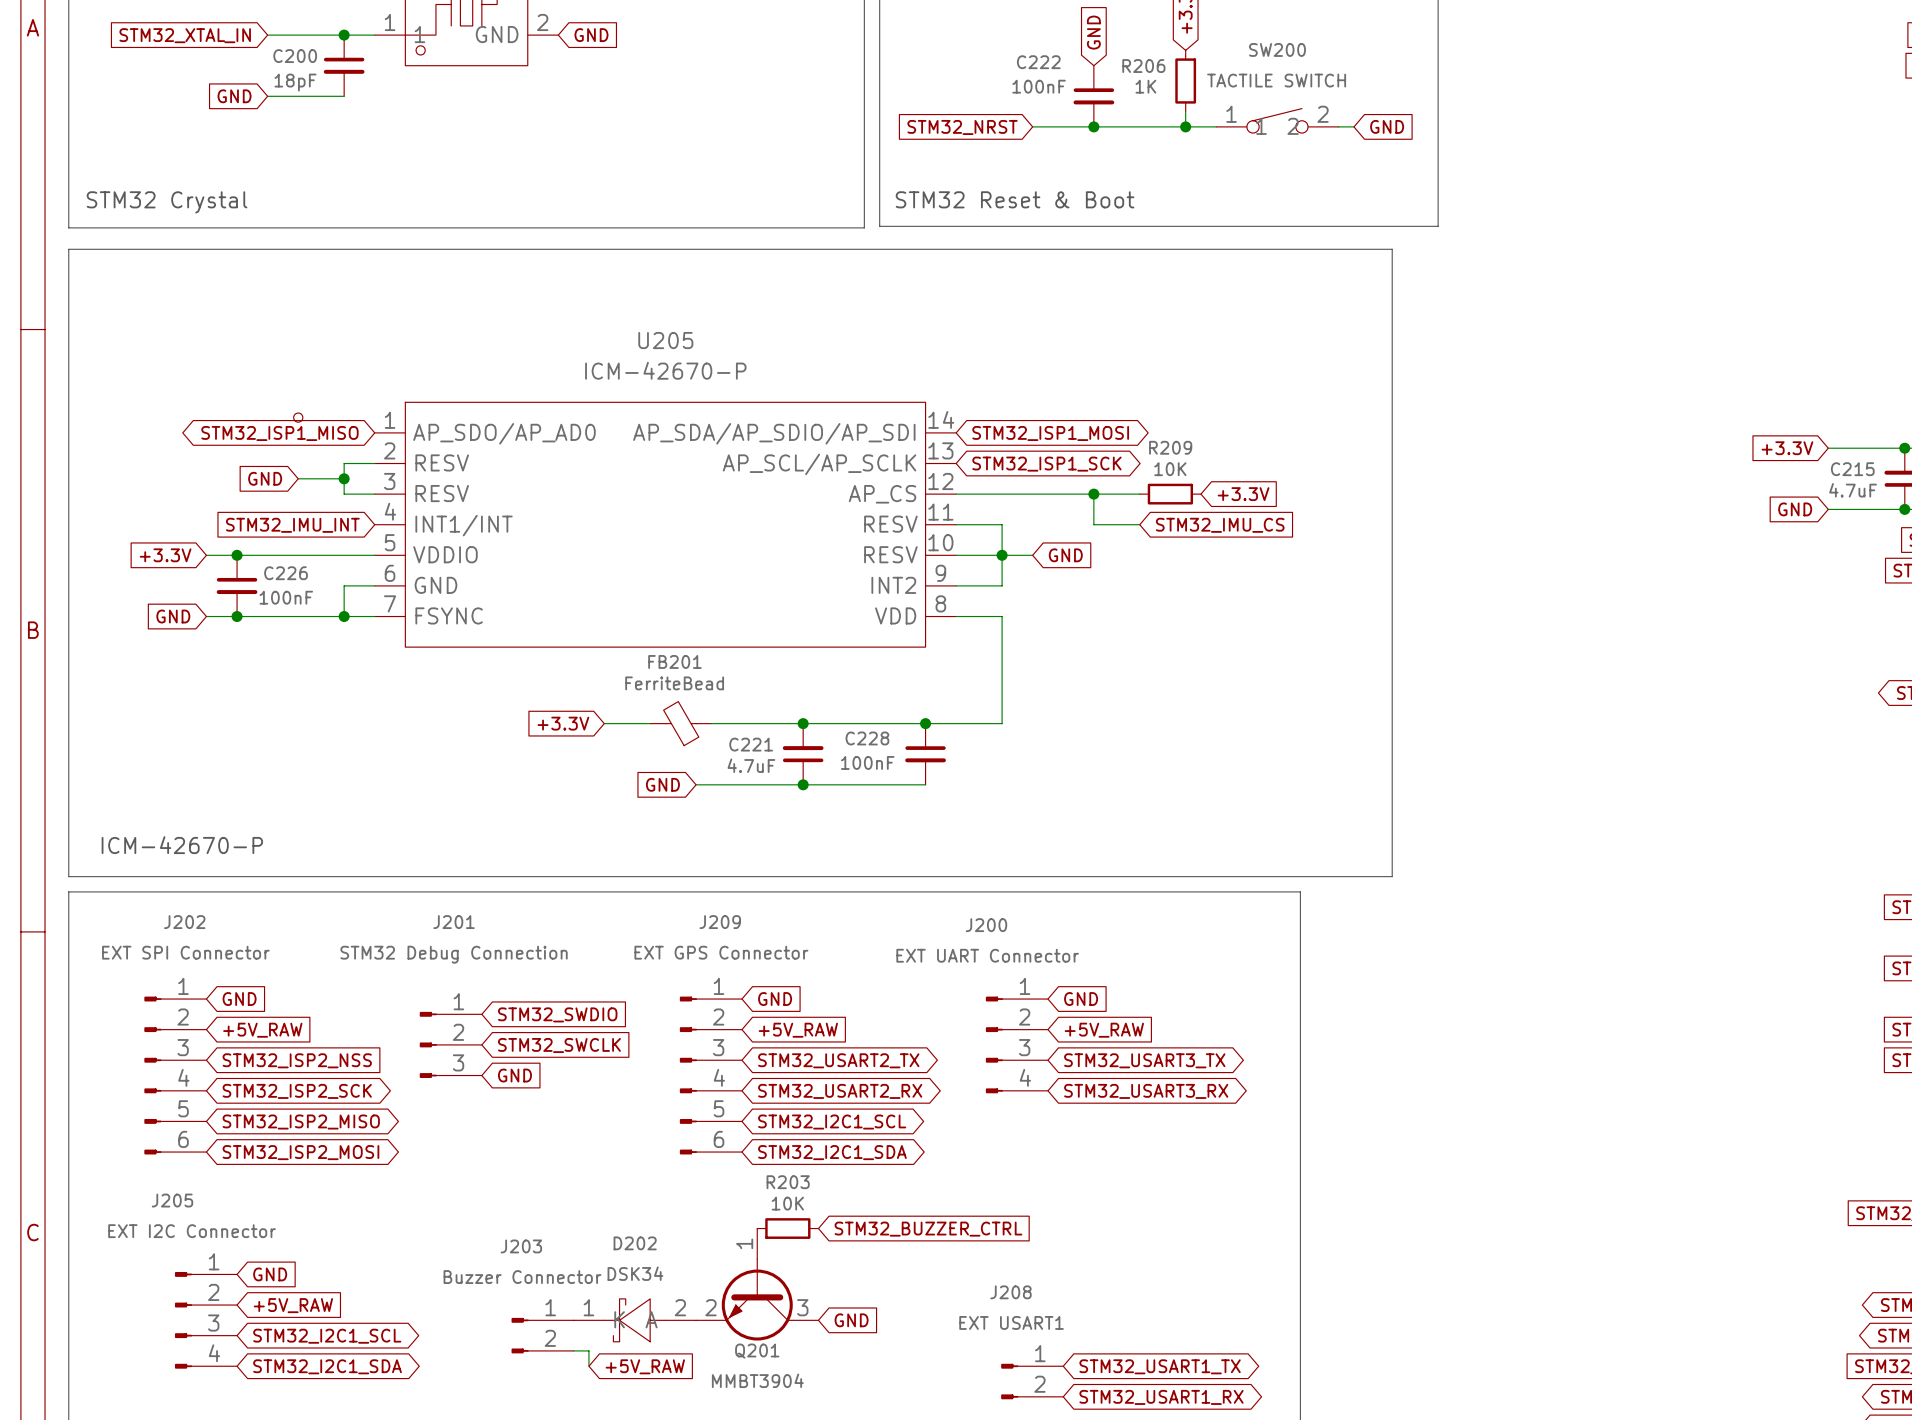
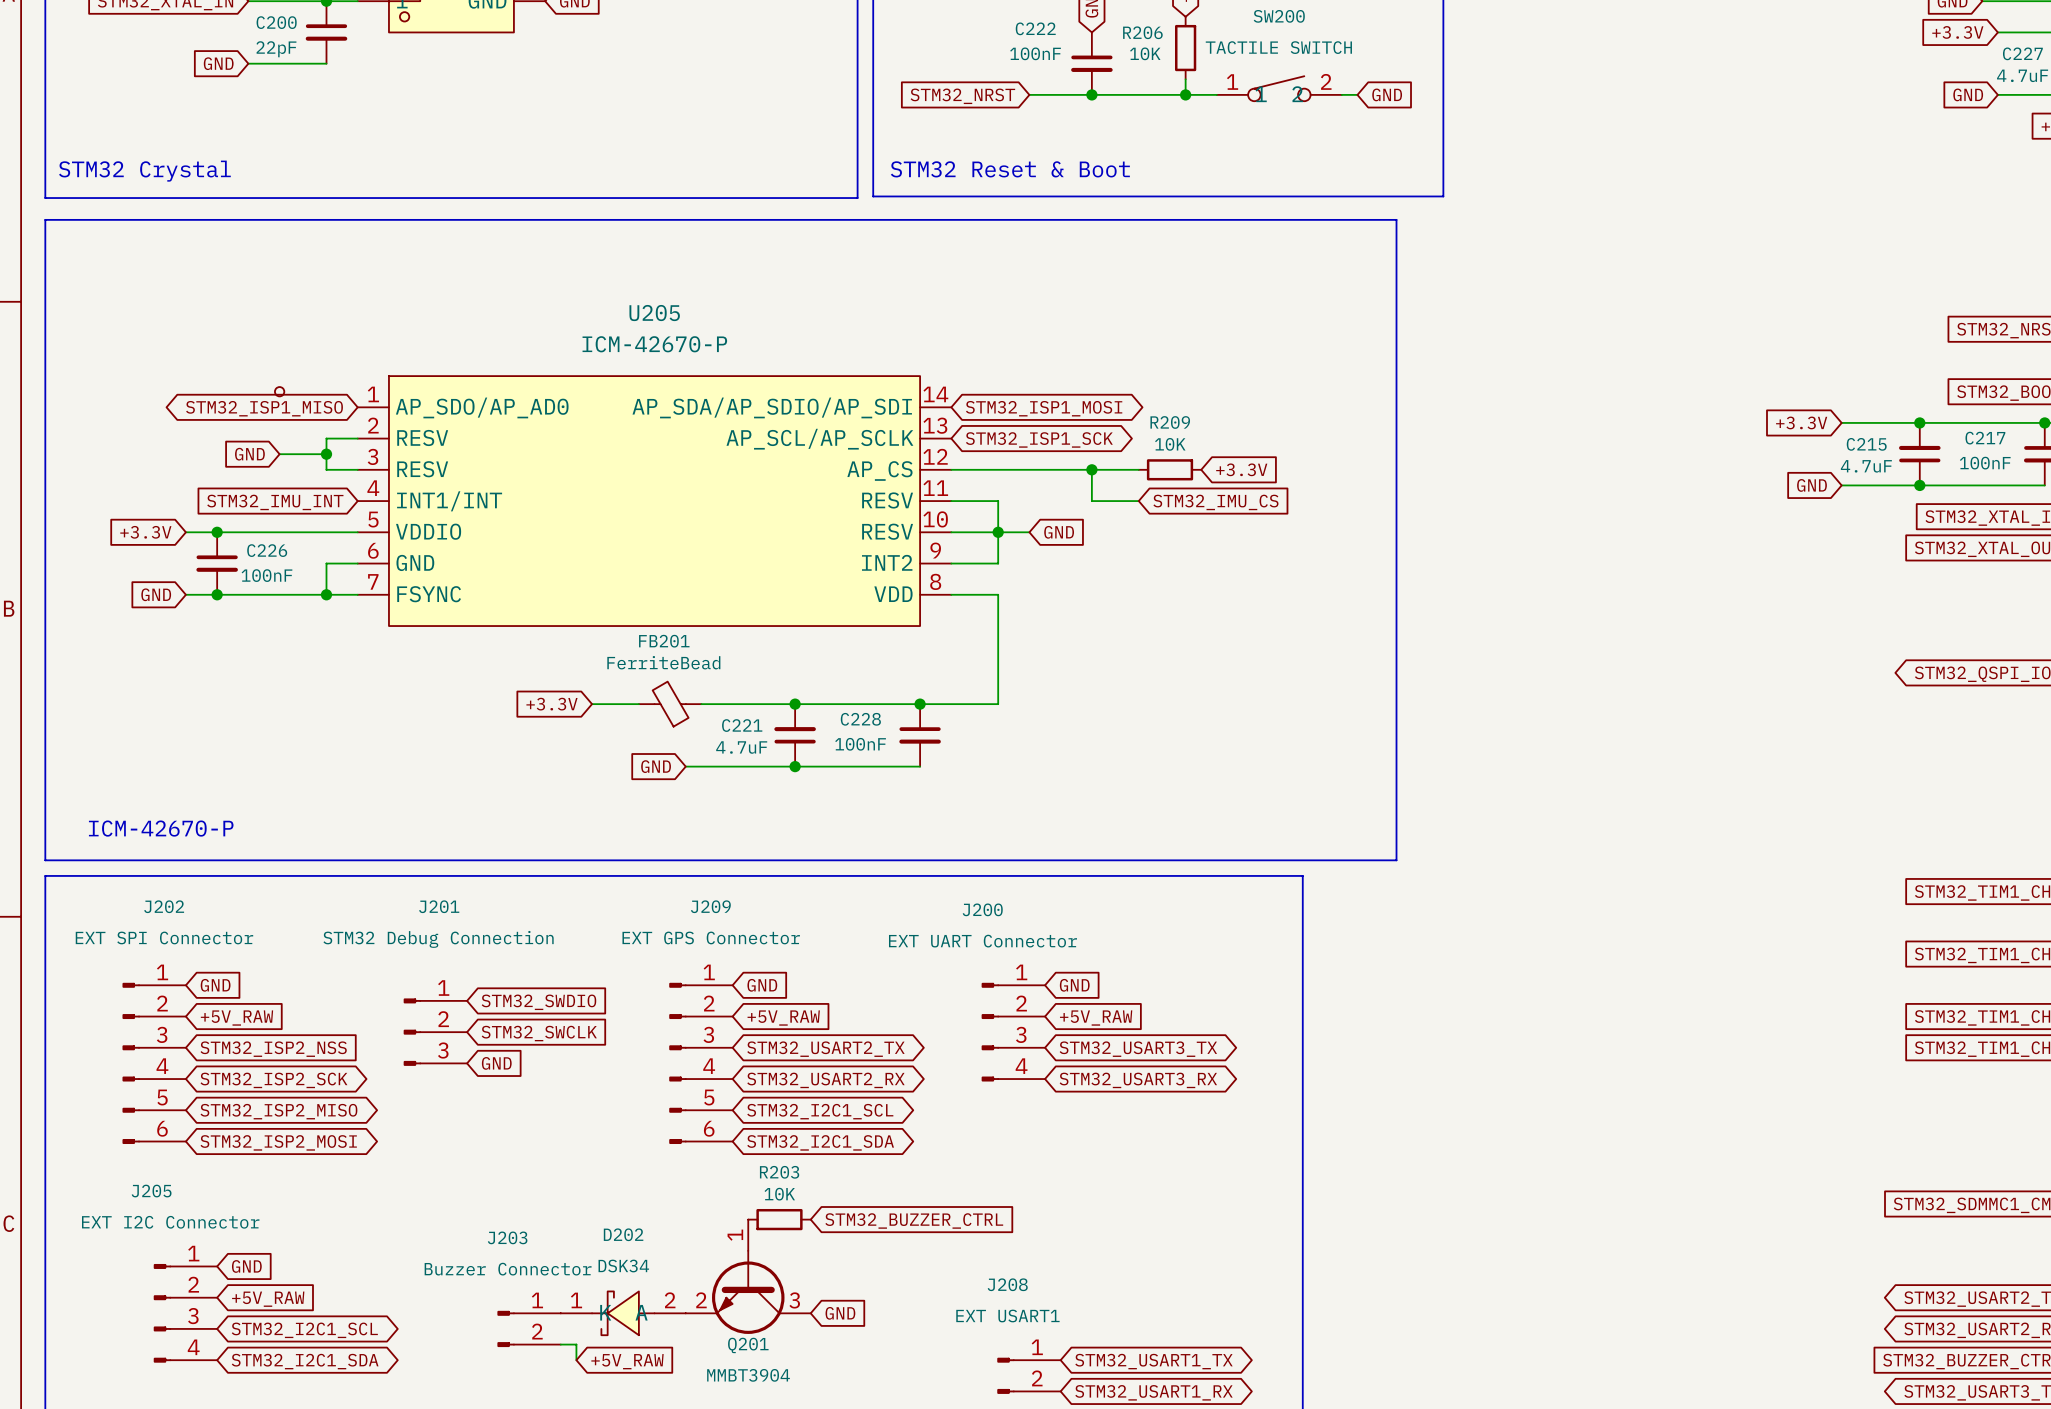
C200 value: 18pF (295, 82) -> 22pF (276, 49)
R206 value: 1K (1145, 86) -> 10K (1145, 53)

